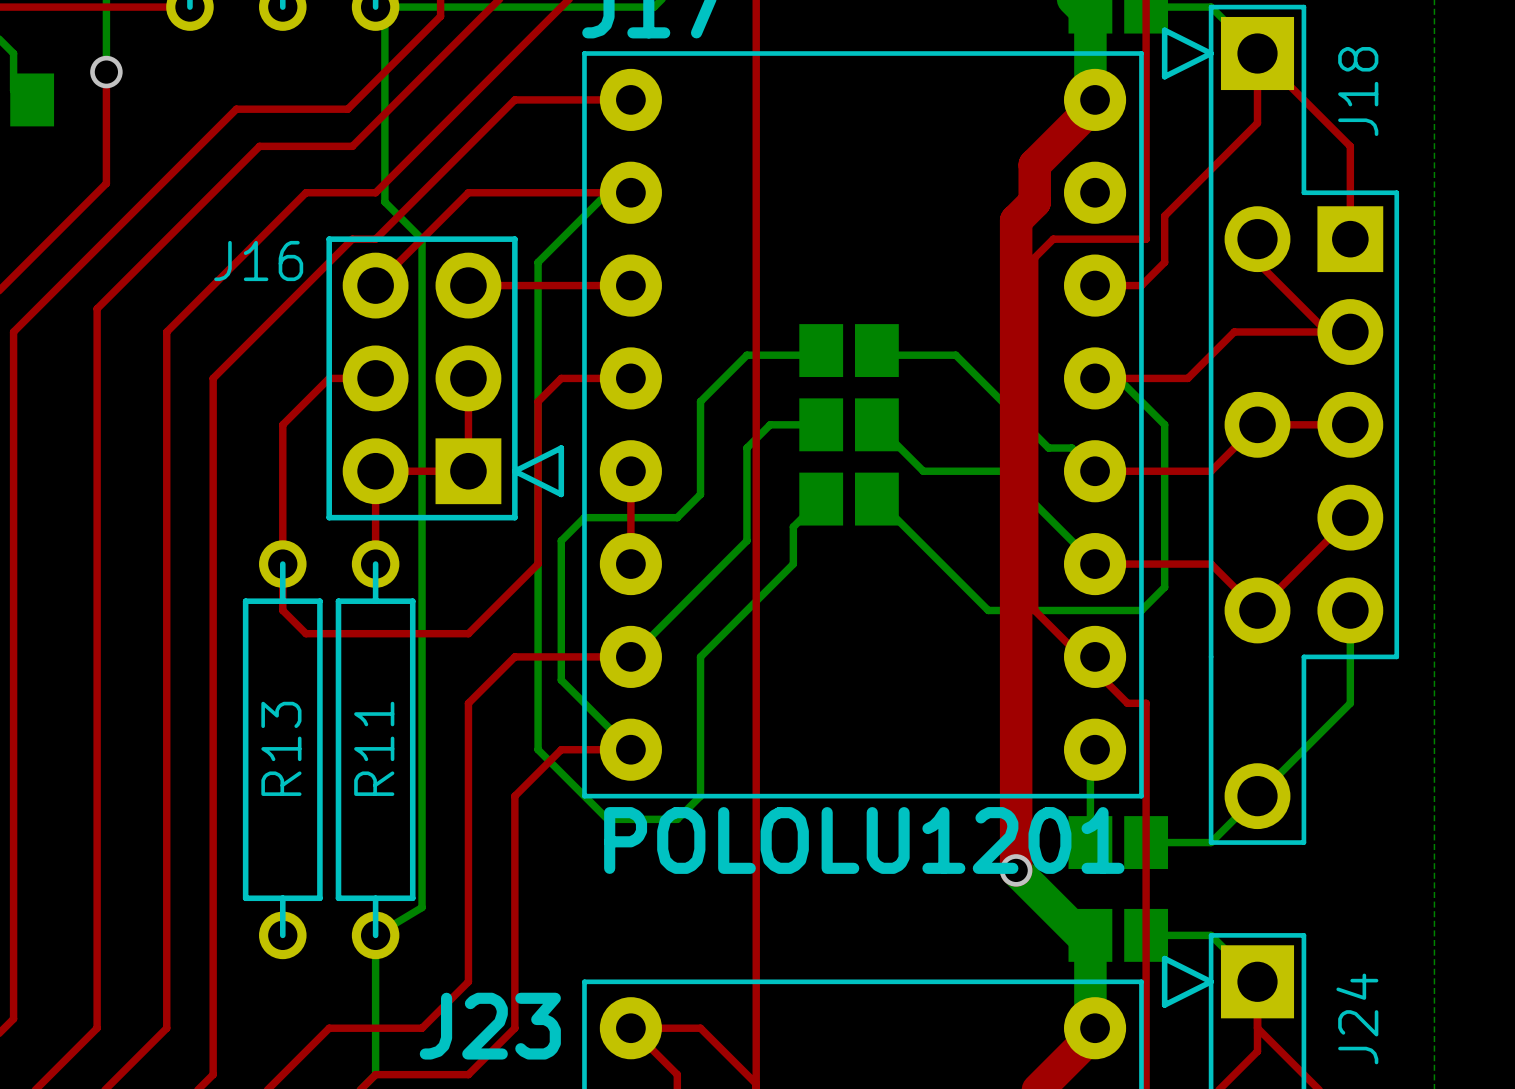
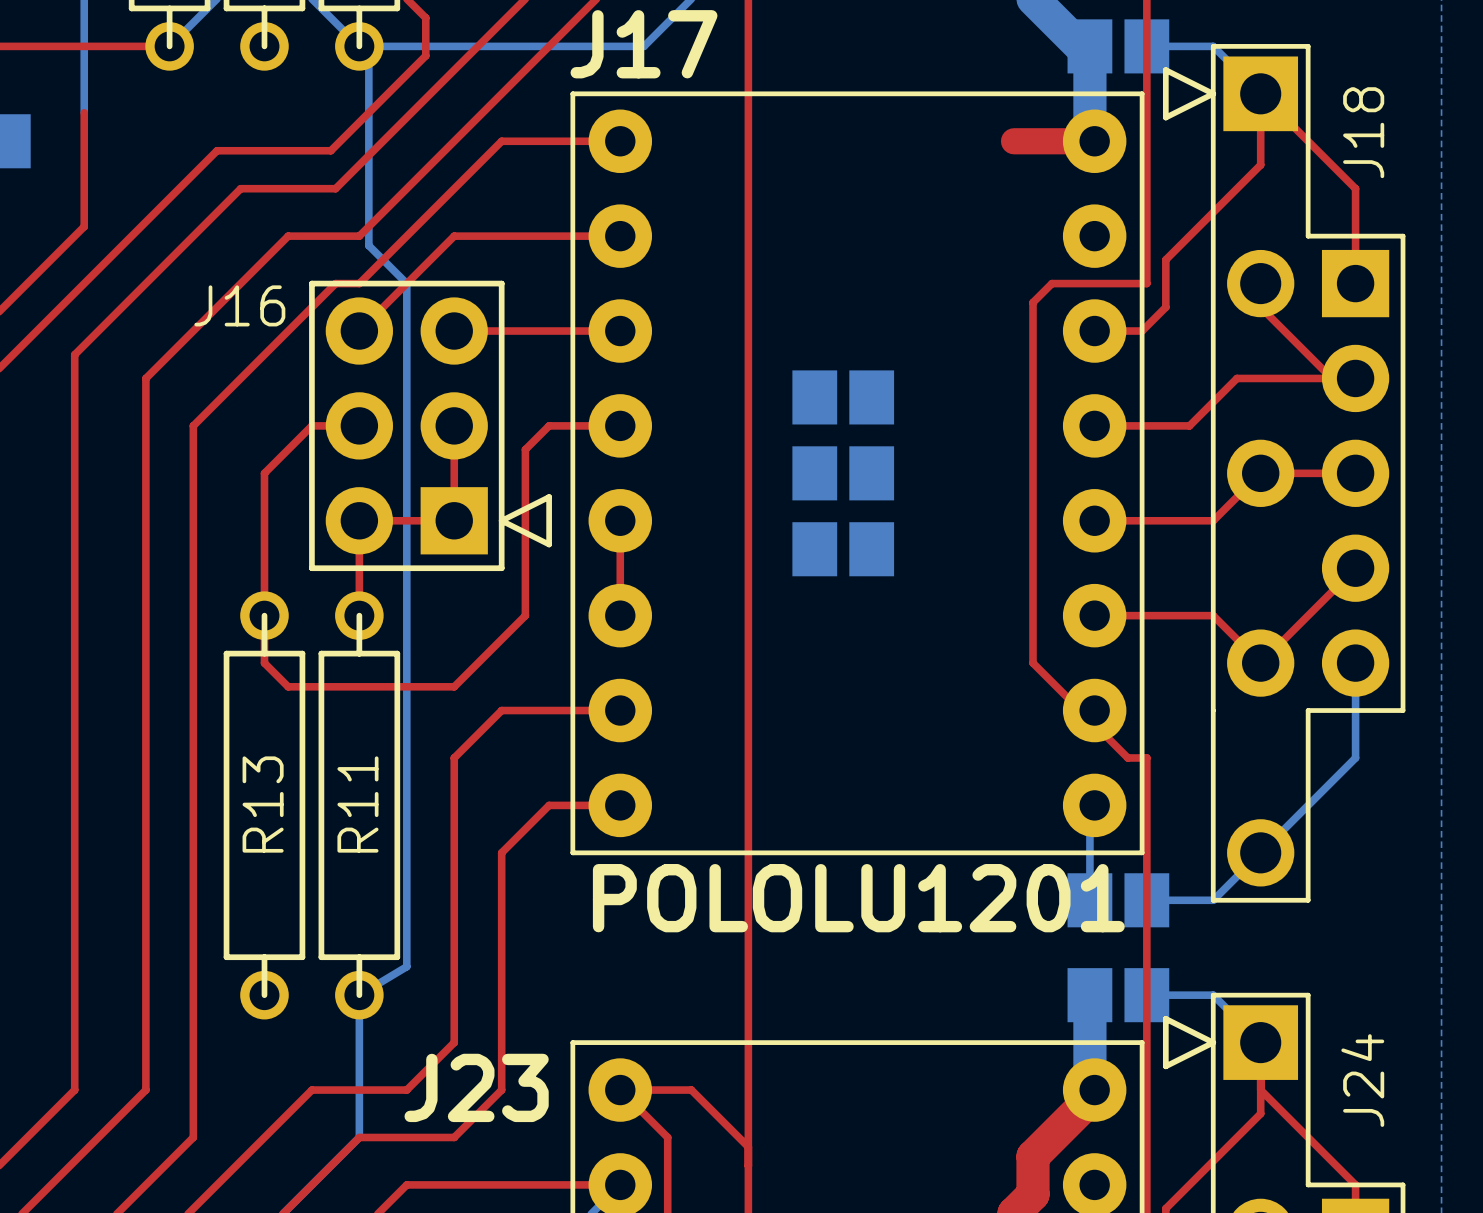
via: (106, 72) -> none
top track: (1095, 99) (1090, 109) (1034, 164) (1034, 202) (1016, 220) (1016, 870) -> (1094, 141) (1014, 141)
bottom track: (630, 192) (607, 192) (538, 262) (538, 749) (607, 819) (677, 819) (700, 796) (700, 656) (793, 564) (793, 526) (821, 499) -> none
bottom track: (821, 350) (816, 355) (746, 355) (700, 401) (700, 494) (677, 517) (584, 517) (561, 540) (561, 680) (630, 749) -> none
bottom track: (876, 350) (881, 355) (955, 355) (1048, 448) (1071, 448) (1095, 471) -> none
bottom track: (1095, 378) (1118, 378) (1164, 424) (1164, 587) (1141, 610) (988, 610) (876, 499) -> none
bottom track: (821, 424) (770, 424) (746, 448) (746, 540) (630, 656) -> none
bottom track: (876, 424) (923, 471) (1002, 471) (1095, 564) -> none
bottom track: (1016, 870) (1090, 944) -> none
via: (1016, 870) -> none

